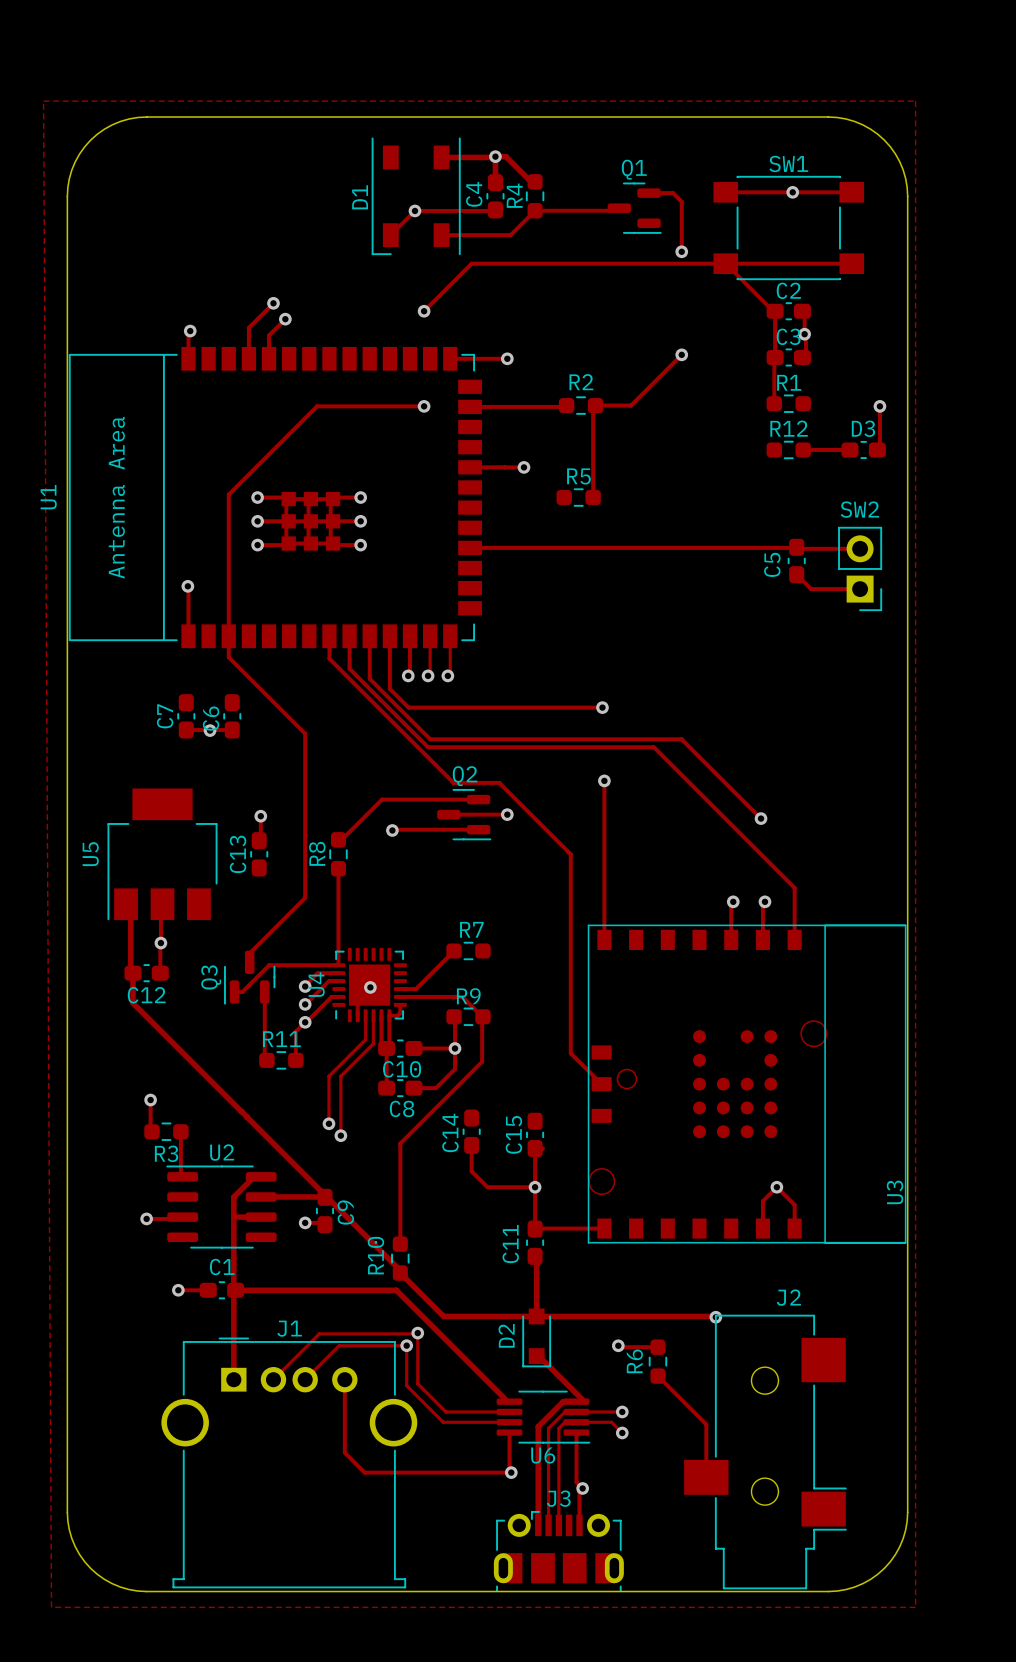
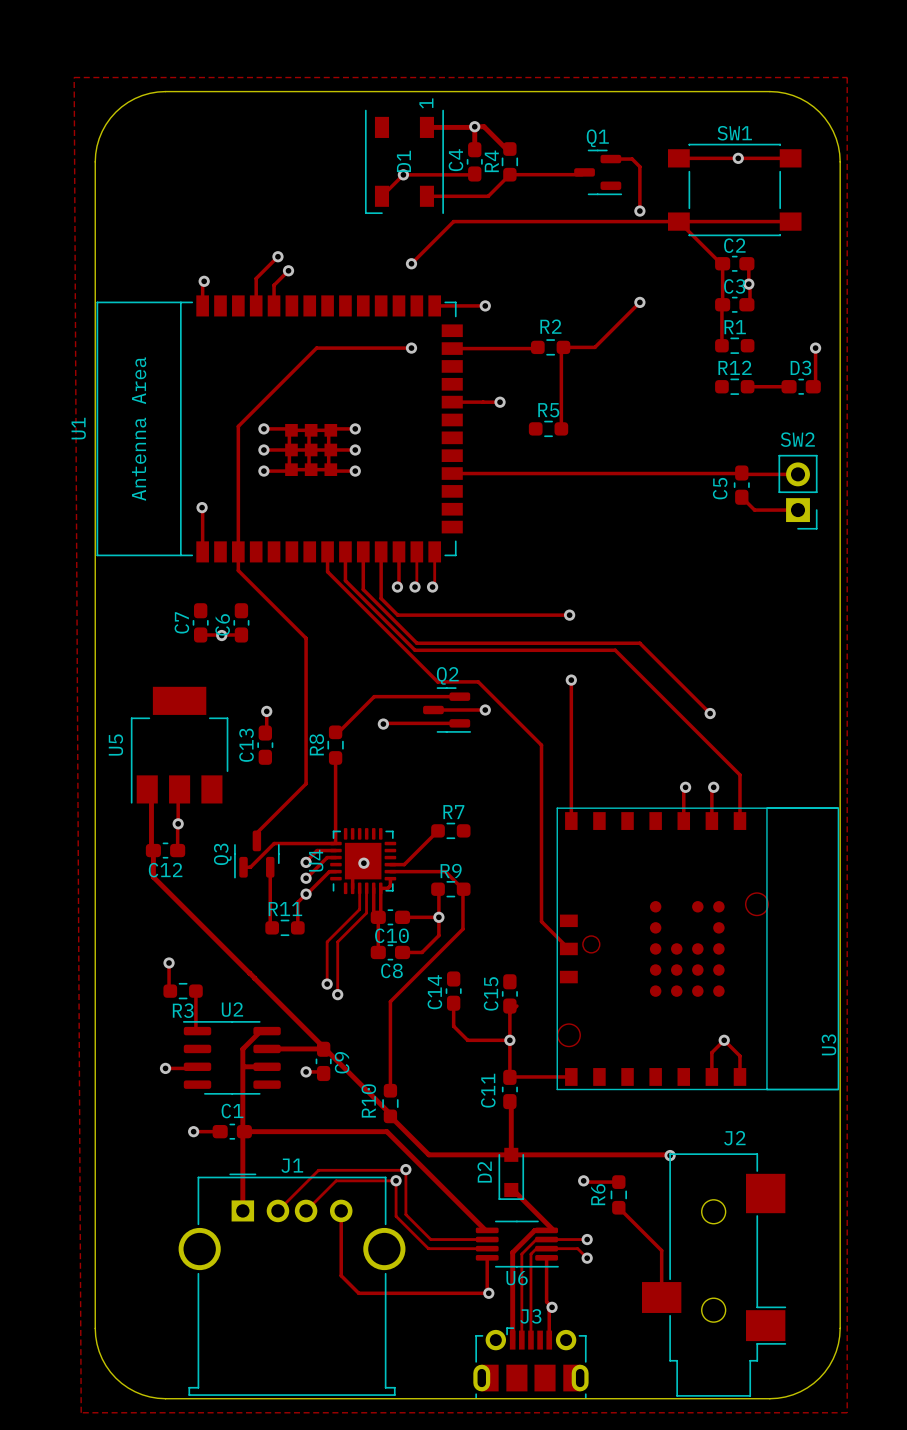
D1 text: none -> 1 (426, 103)
D1 name position: D1 (360, 197) -> D1 (403, 161)

